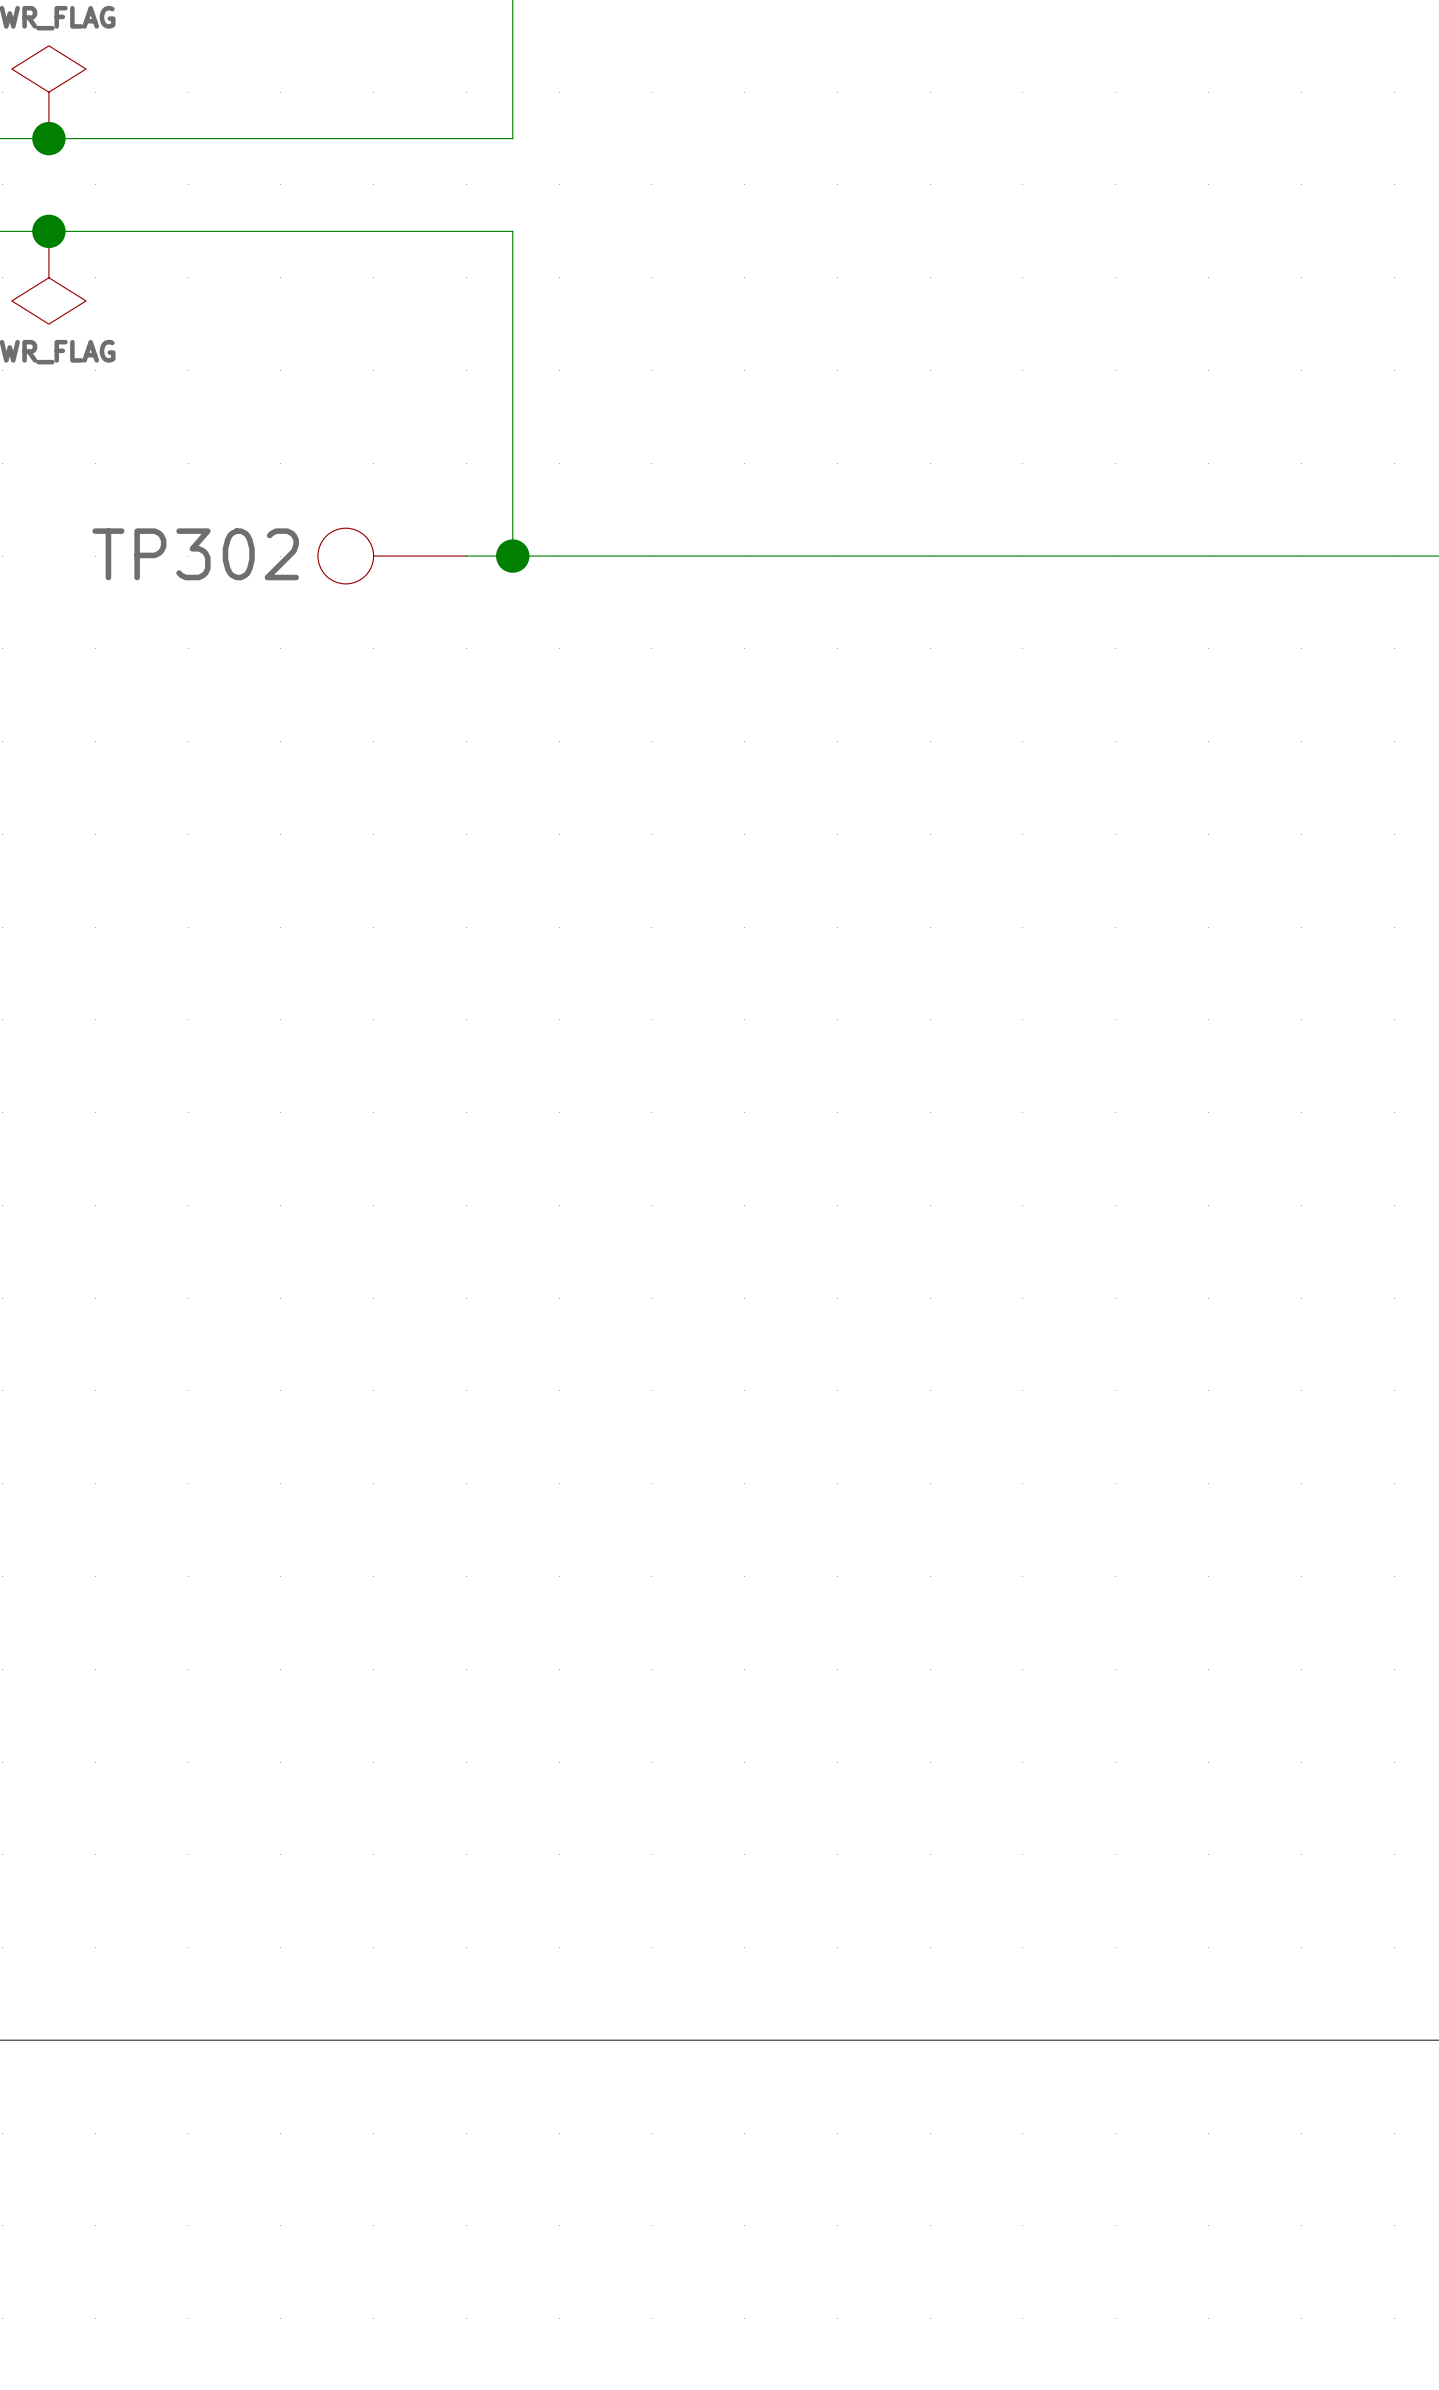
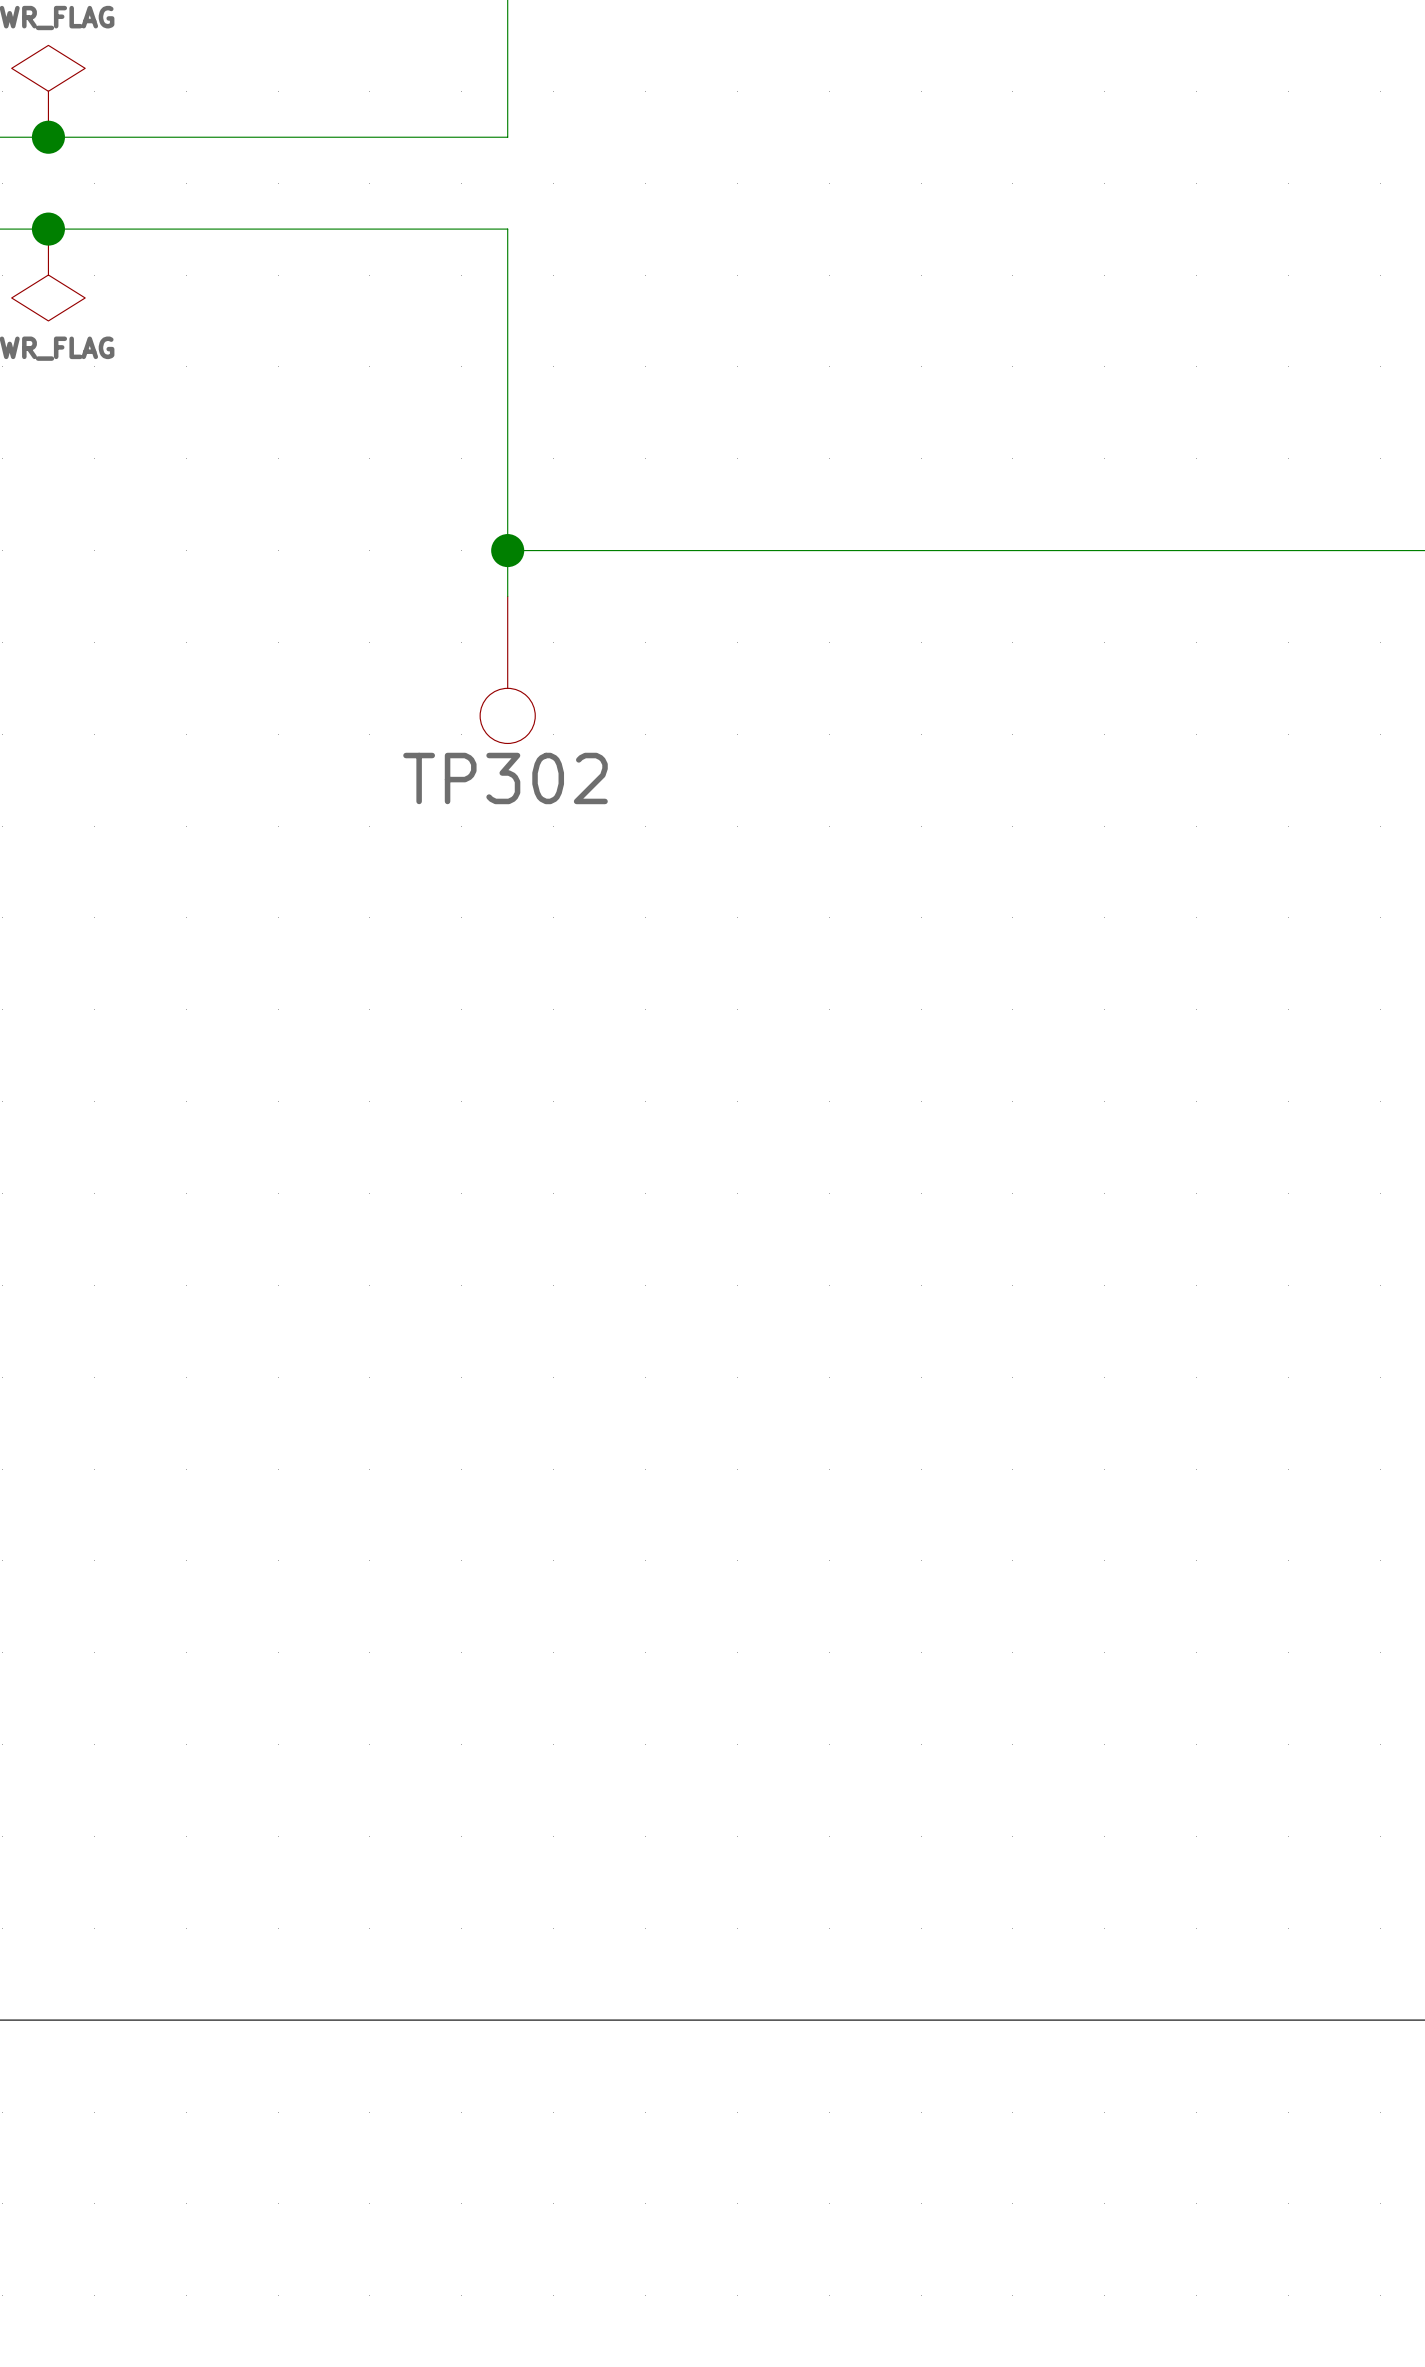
TP302 name position: TP302 (195, 554) -> TP302 (505, 778)
TP302 rotation: 0° (345, 556) -> 90° counterclockwise (507, 715)
TP302 position: (392, 556) -> (507, 669)
wire: (466, 556) (512, 556) -> (507, 596) (507, 550)

